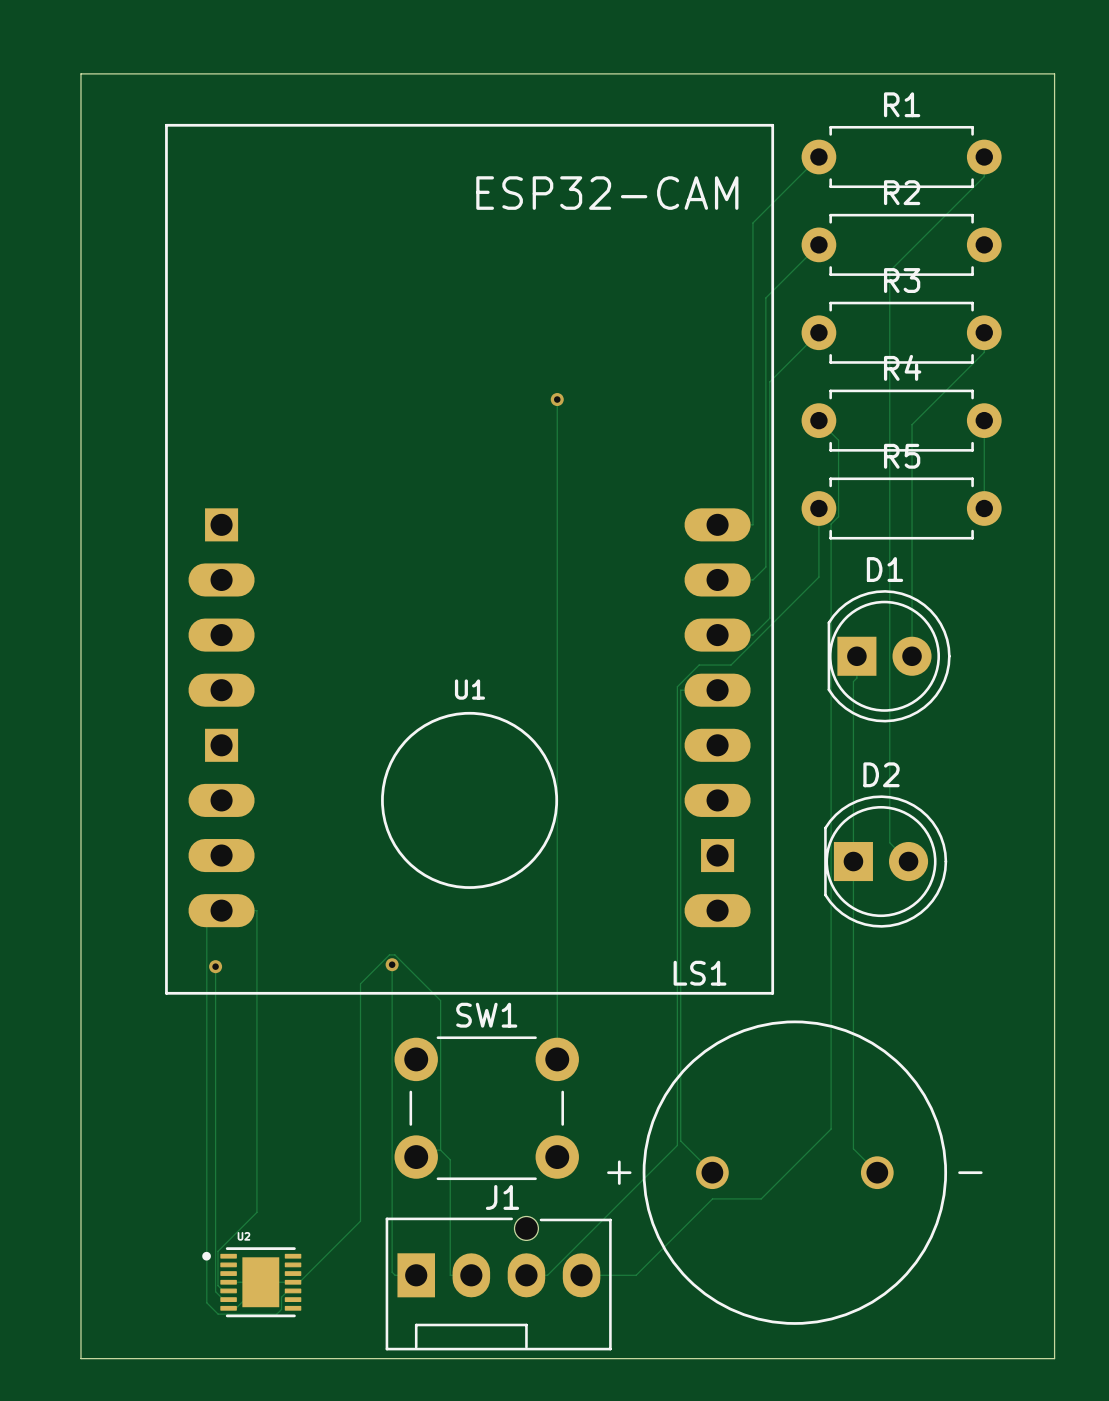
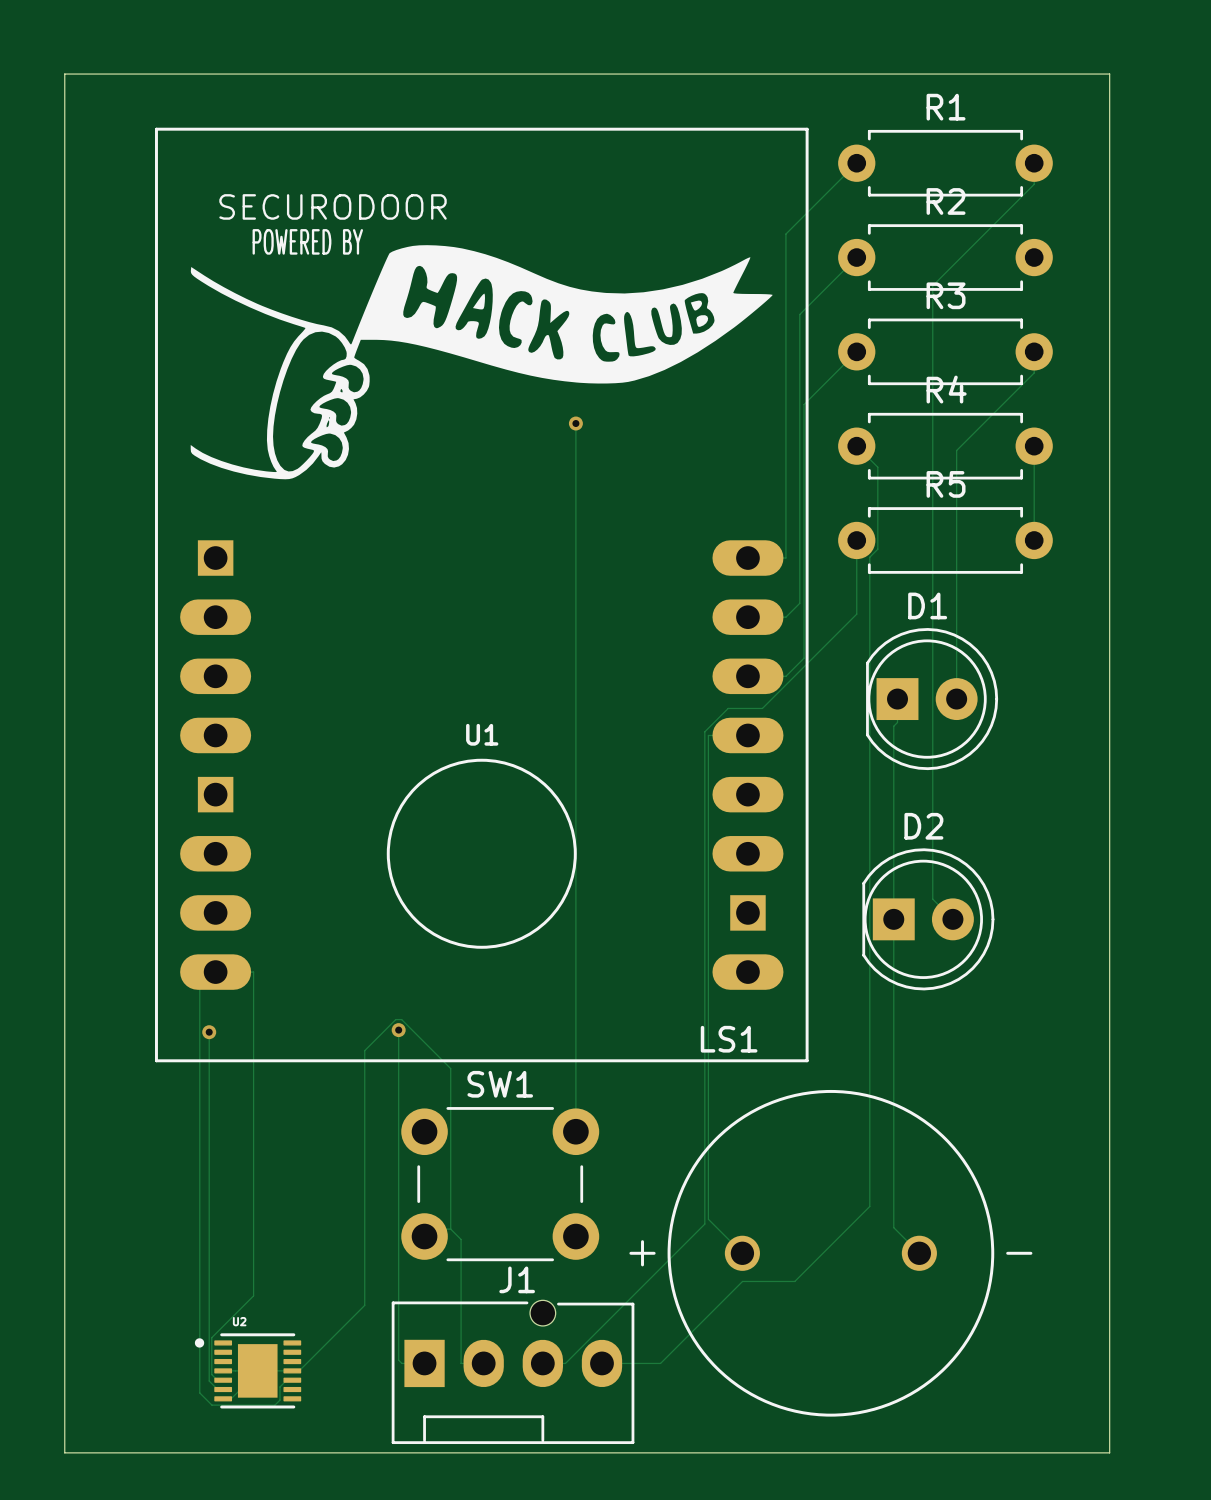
U1 text: ESP32-CAM (607, 193) -> none
text: none -> SECURODOOR (333, 206)
text: none -> POWERED BY (307, 241)
drawing: none -> [190, 245, 773, 480]

